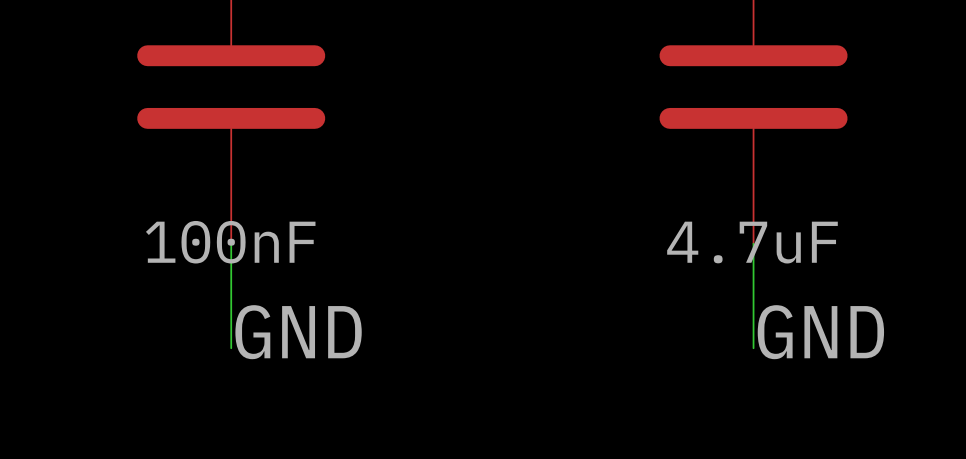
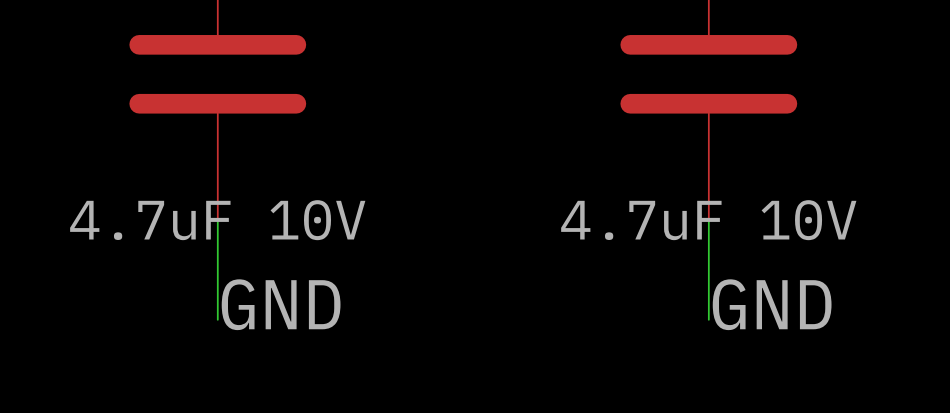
part value: 100nF (230, 242) -> 4.7uF 10V (217, 220)
part value: 4.7uF (752, 242) -> 4.7uF 10V (708, 220)

